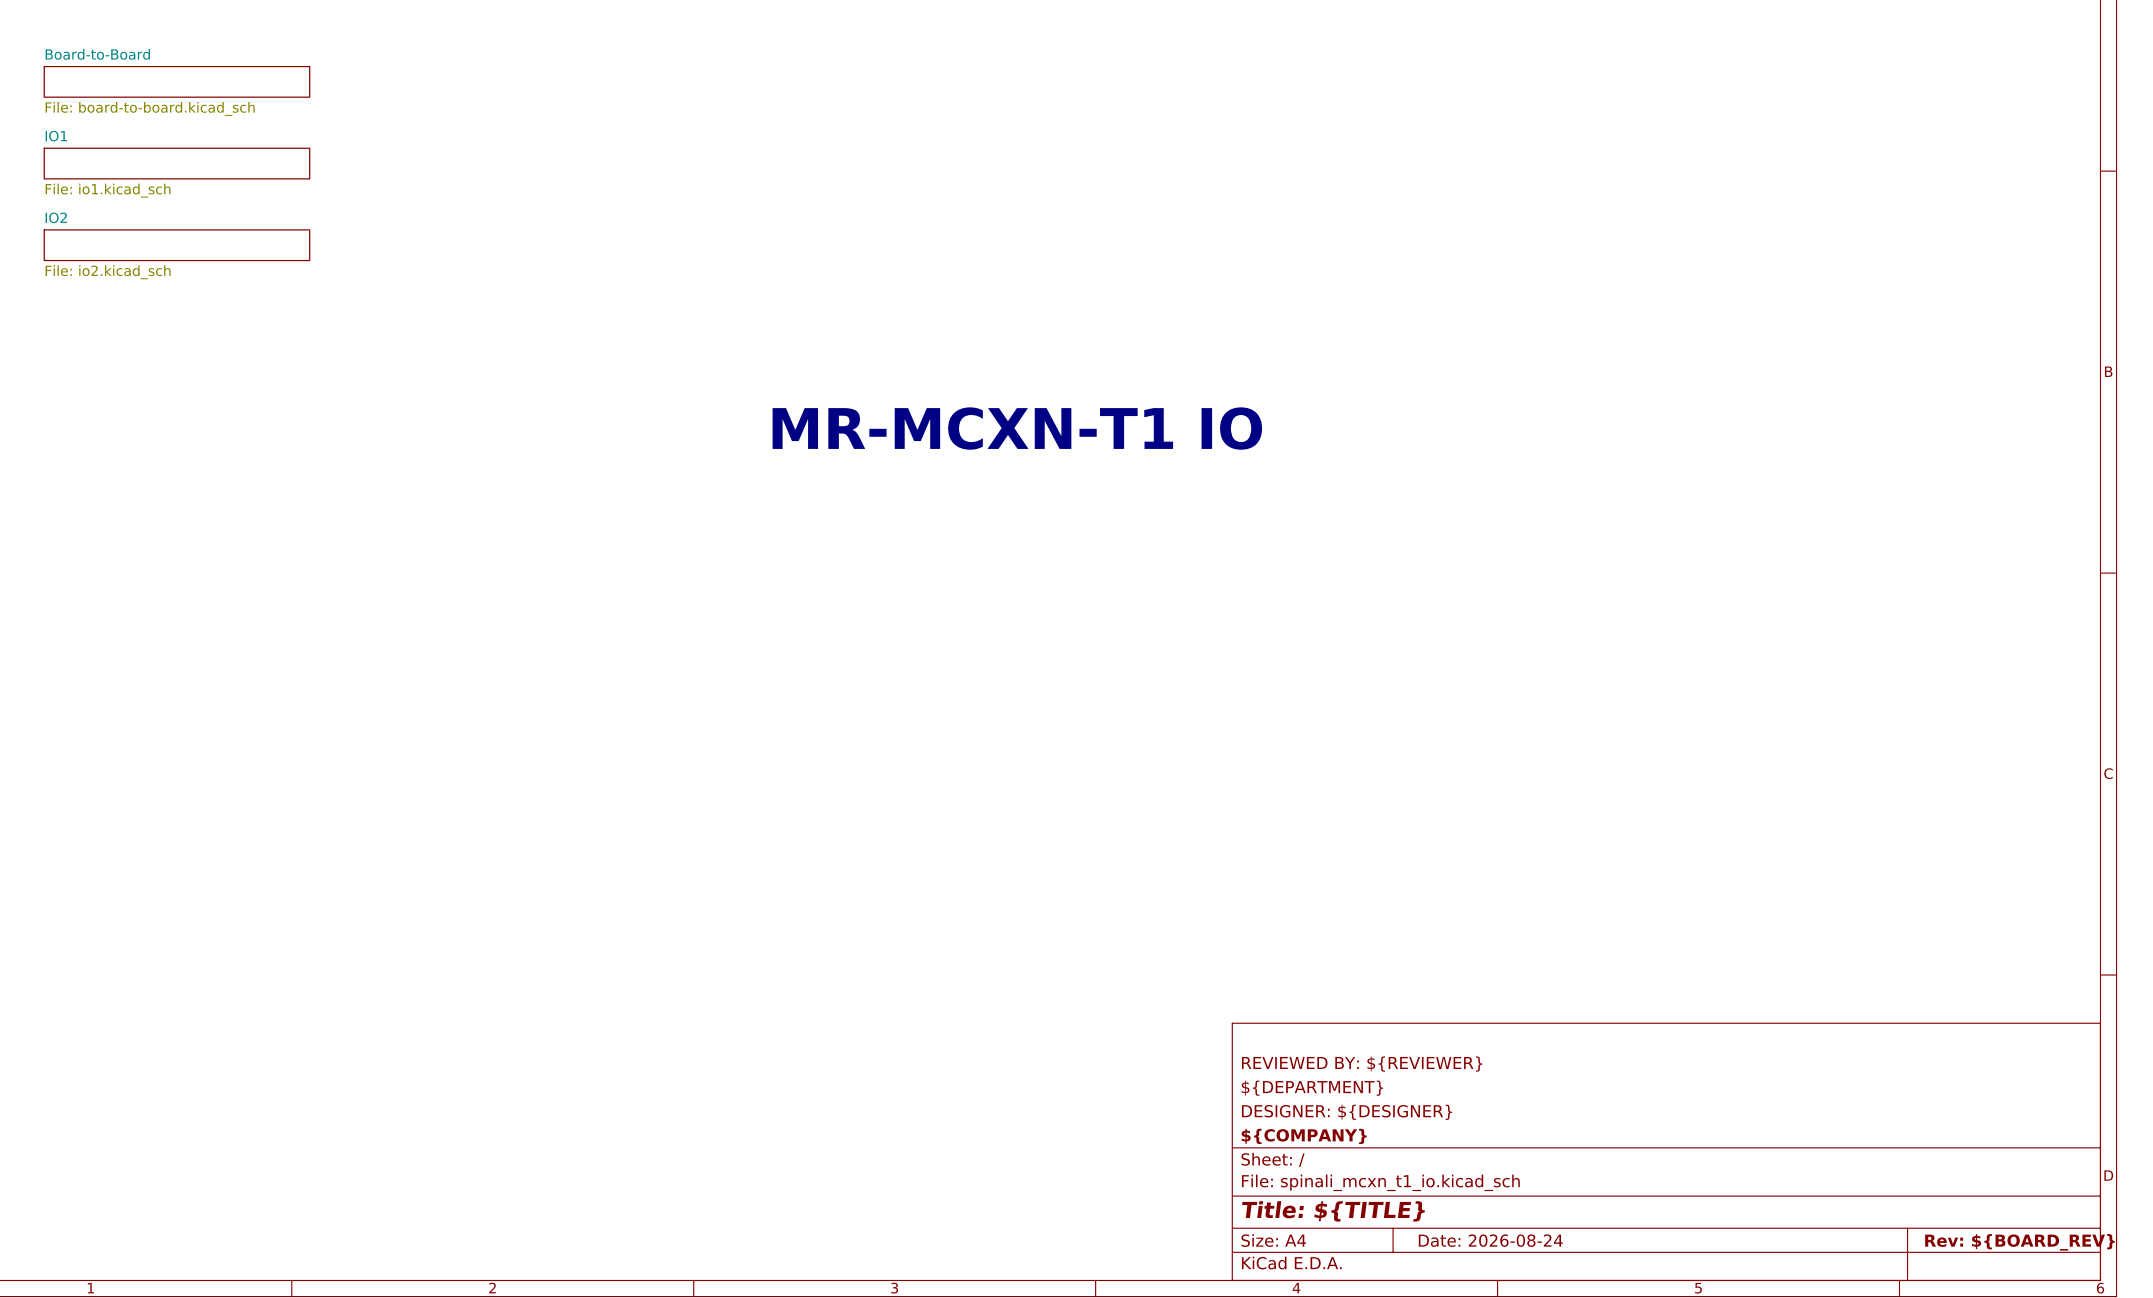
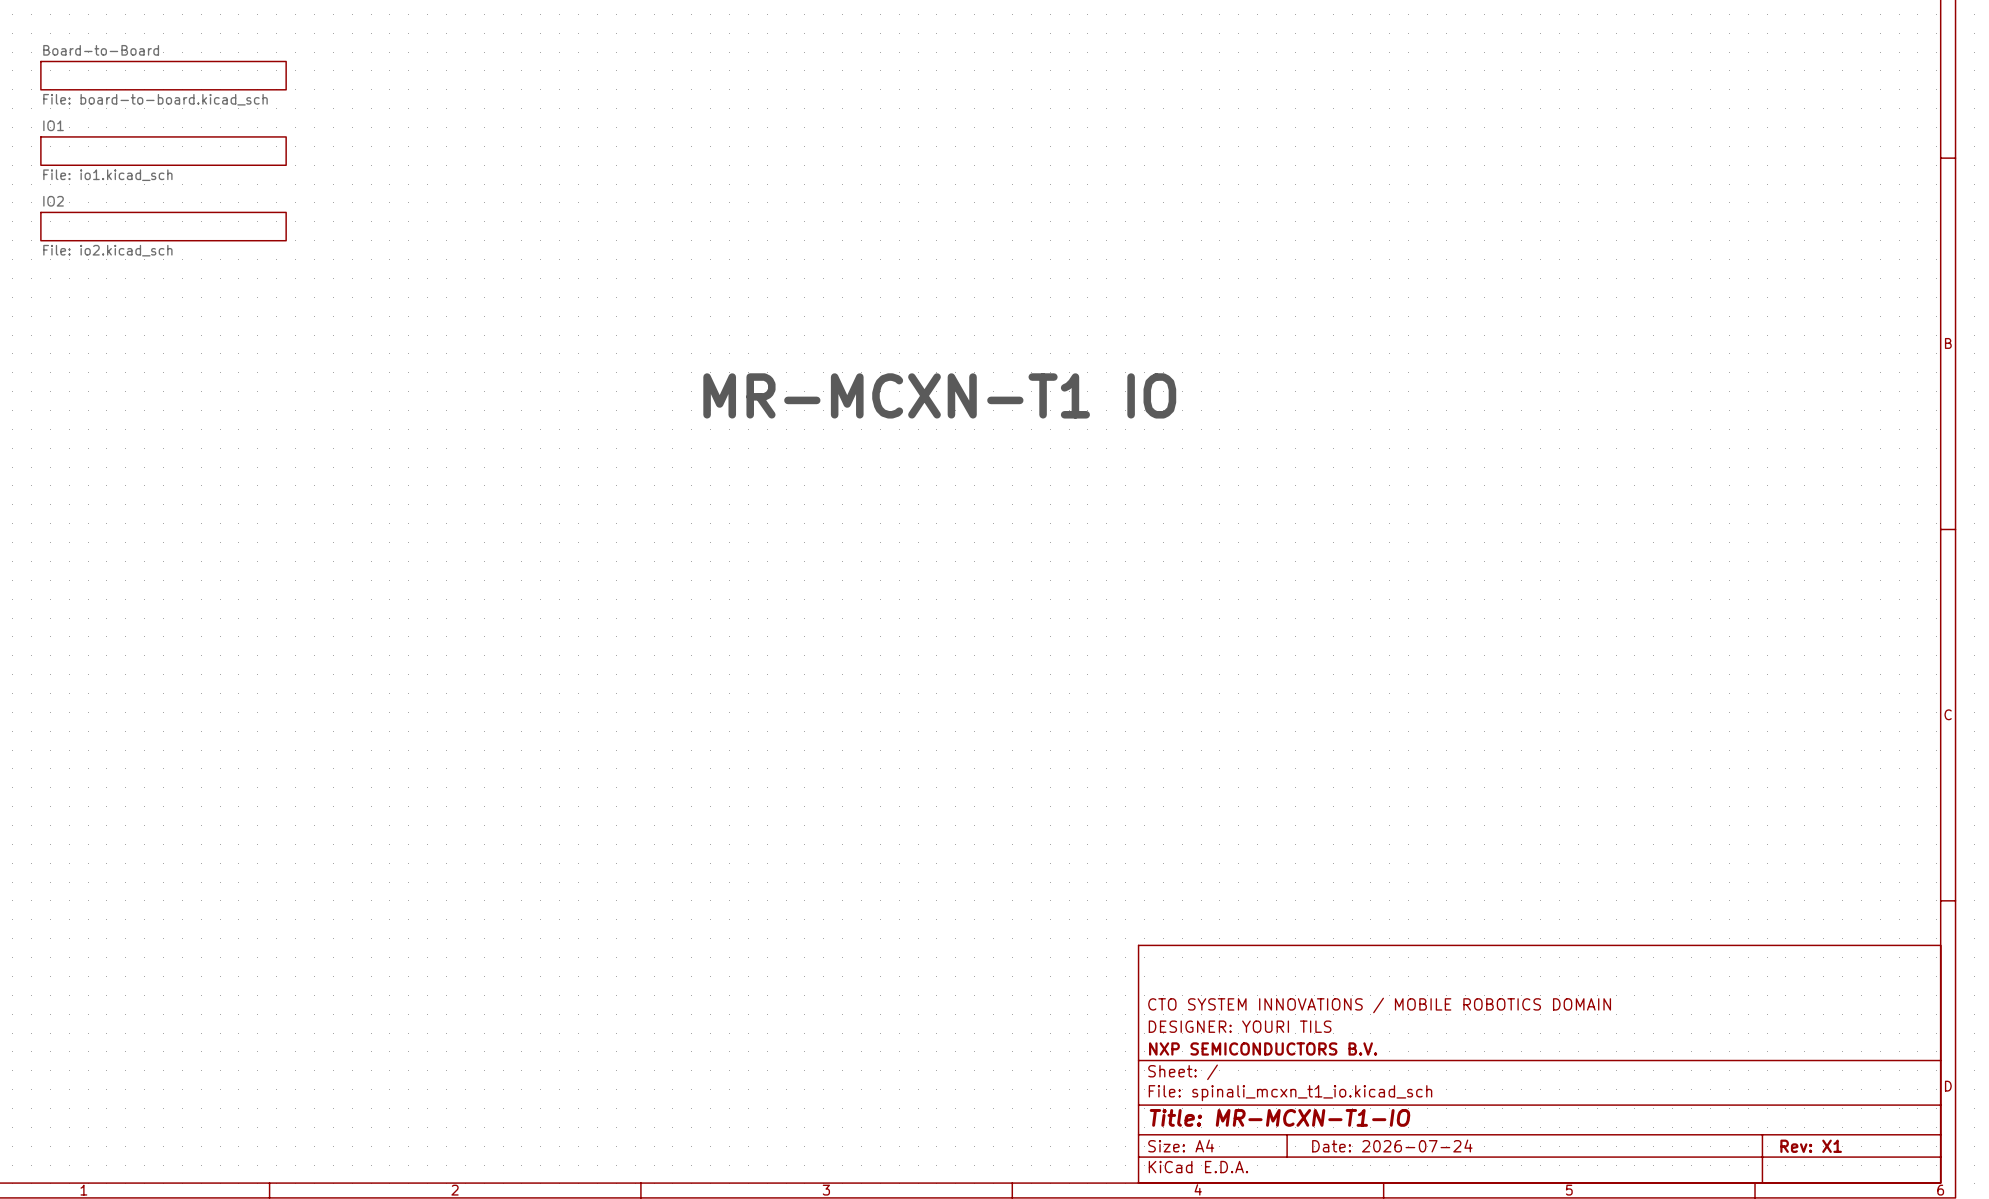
title block: REVIEWED BY: ${REVIEWER} (1362, 1064) -> none
title block: ${DEPARTMENT} (1312, 1088) -> CTO SYSTEM INNOVATIONS / MOBILE ROBOTICS DOMAIN (1379, 1005)
title block: DESIGNER: ${DESIGNER} (1347, 1112) -> DESIGNER: YOURI TILS (1240, 1026)
title block: ${COMPANY} (1304, 1136) -> NXP SEMICONDUCTORS B.V. (1263, 1048)
title block: Title: ${TITLE} (1333, 1211) -> Title: MR-MCXN-T1-IO (1279, 1117)
title block: Date: 2026-08-24 (1490, 1240) -> Date: 2026-07-24 (1392, 1145)
title block: Rev: ${BOARD_REV} (2019, 1242) -> Rev: X1 (1811, 1146)

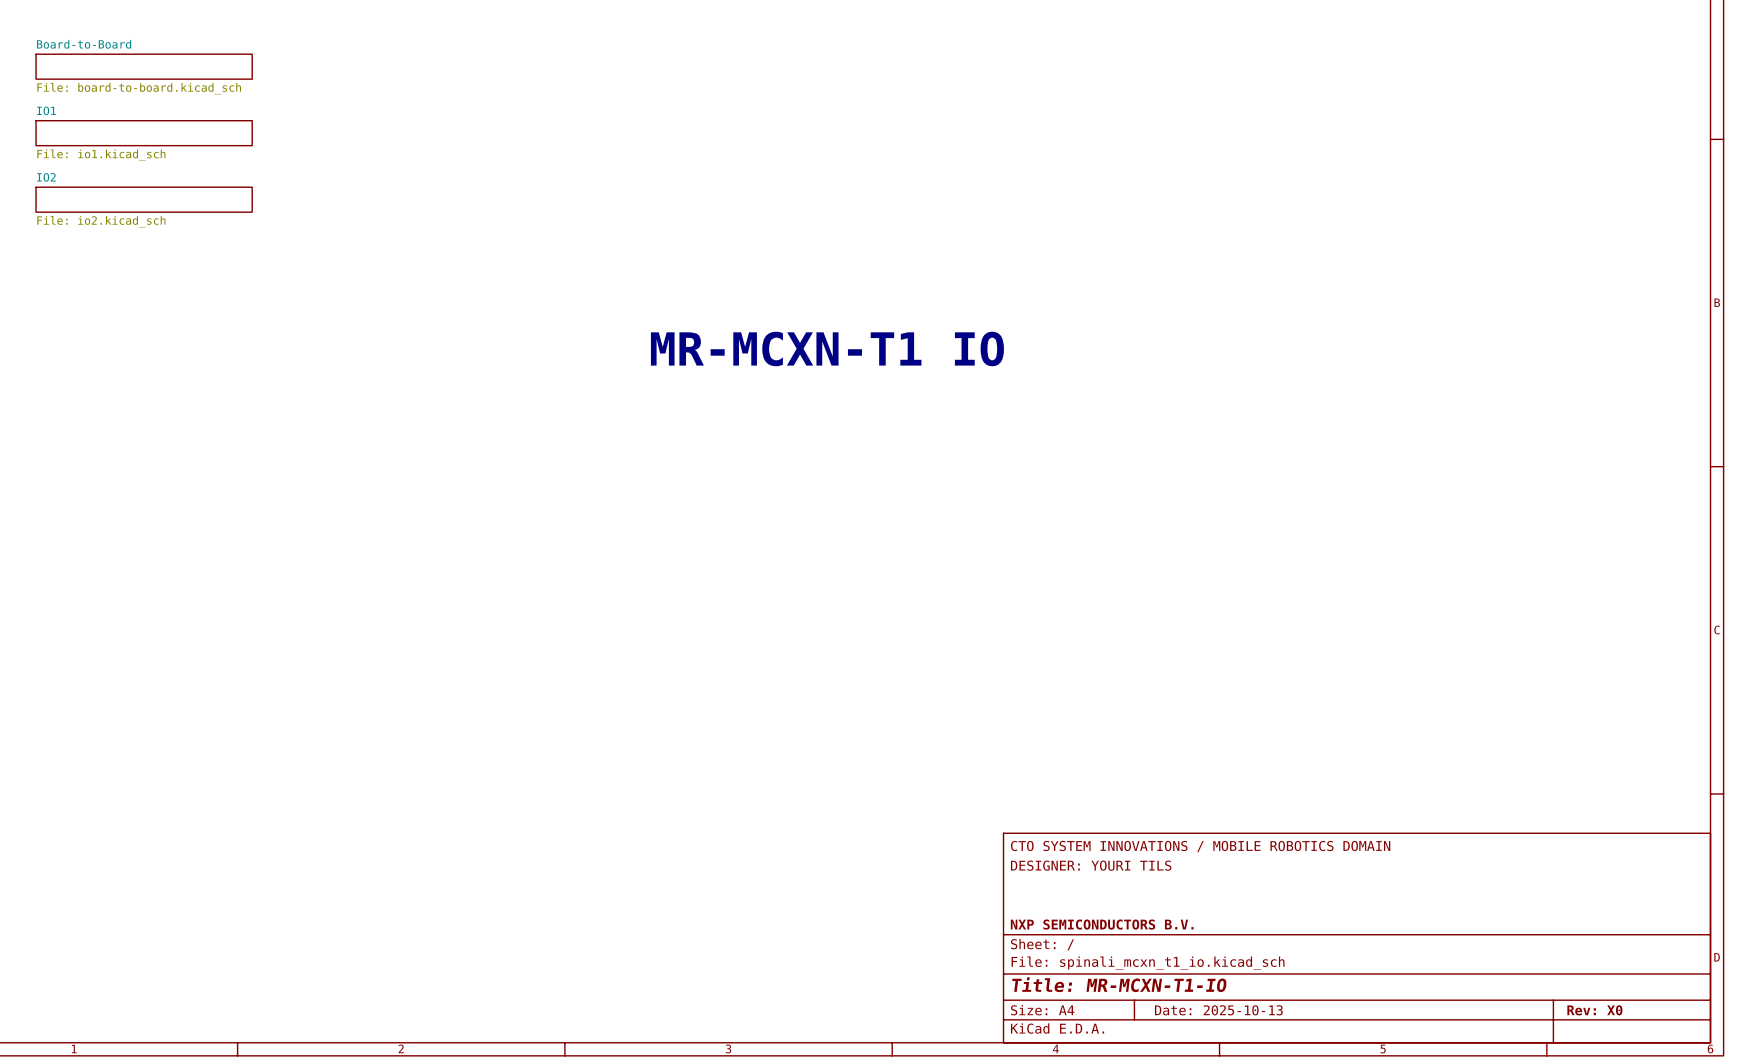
title block position: CTO SYSTEM INNOVATIONS / MOBILE ROBOTICS DOMAIN (1379, 1005) -> CTO SYSTEM INNOVATIONS / MOBILE ROBOTICS DOMAIN (1200, 846)
title block position: DESIGNER: YOURI TILS (1240, 1026) -> DESIGNER: YOURI TILS (1091, 865)
title block: Date: 2026-07-24 (1392, 1145) -> Date: 2025-10-13 (1218, 1010)
title block: Rev: X1 (1811, 1146) -> Rev: X0 (1594, 1010)

